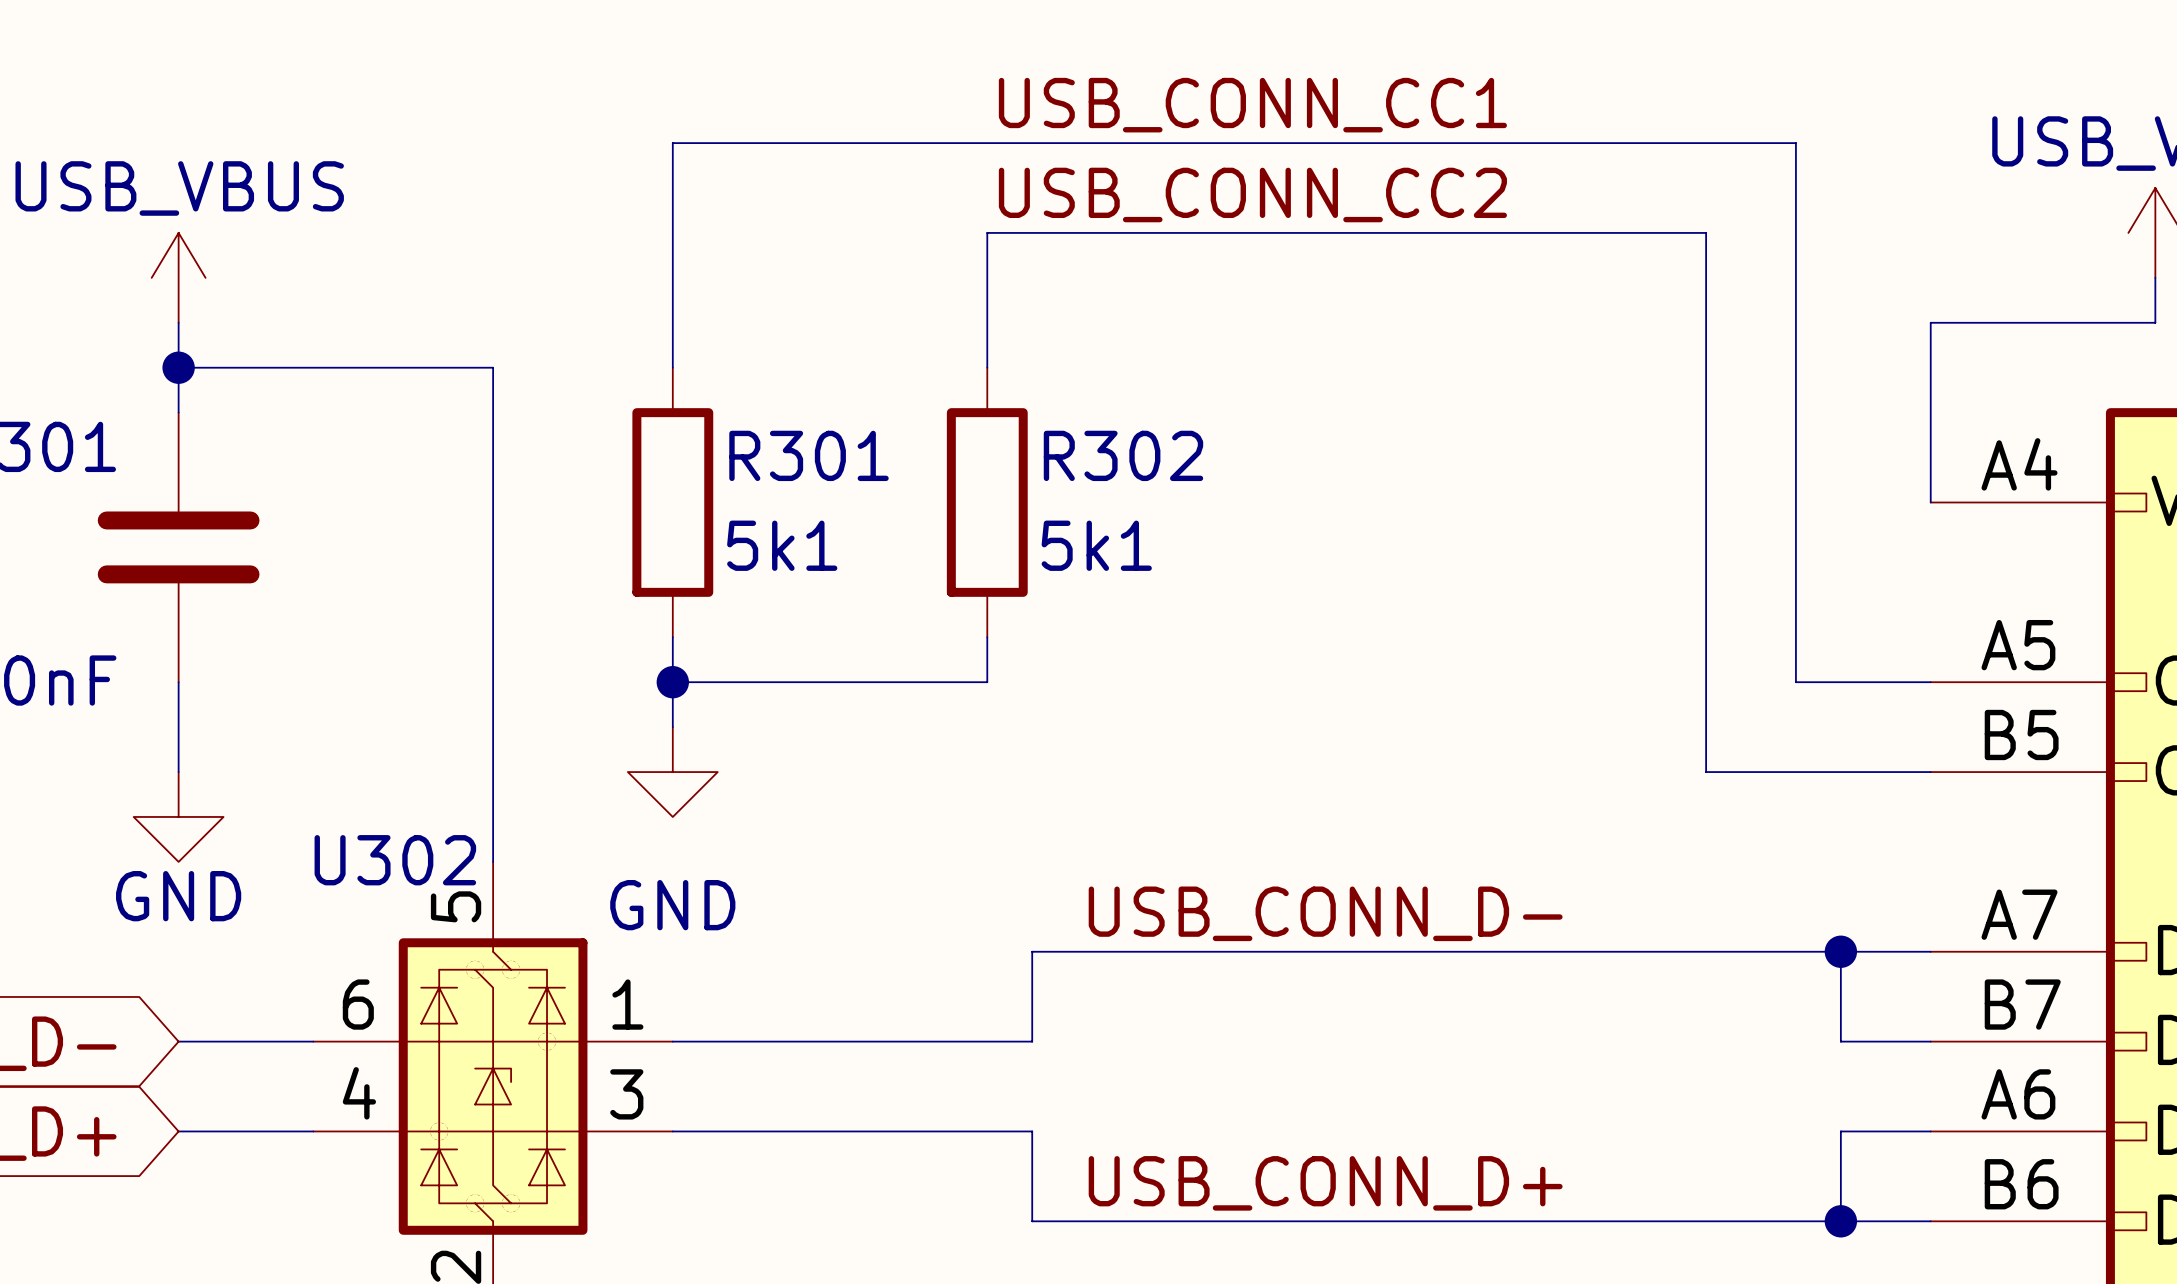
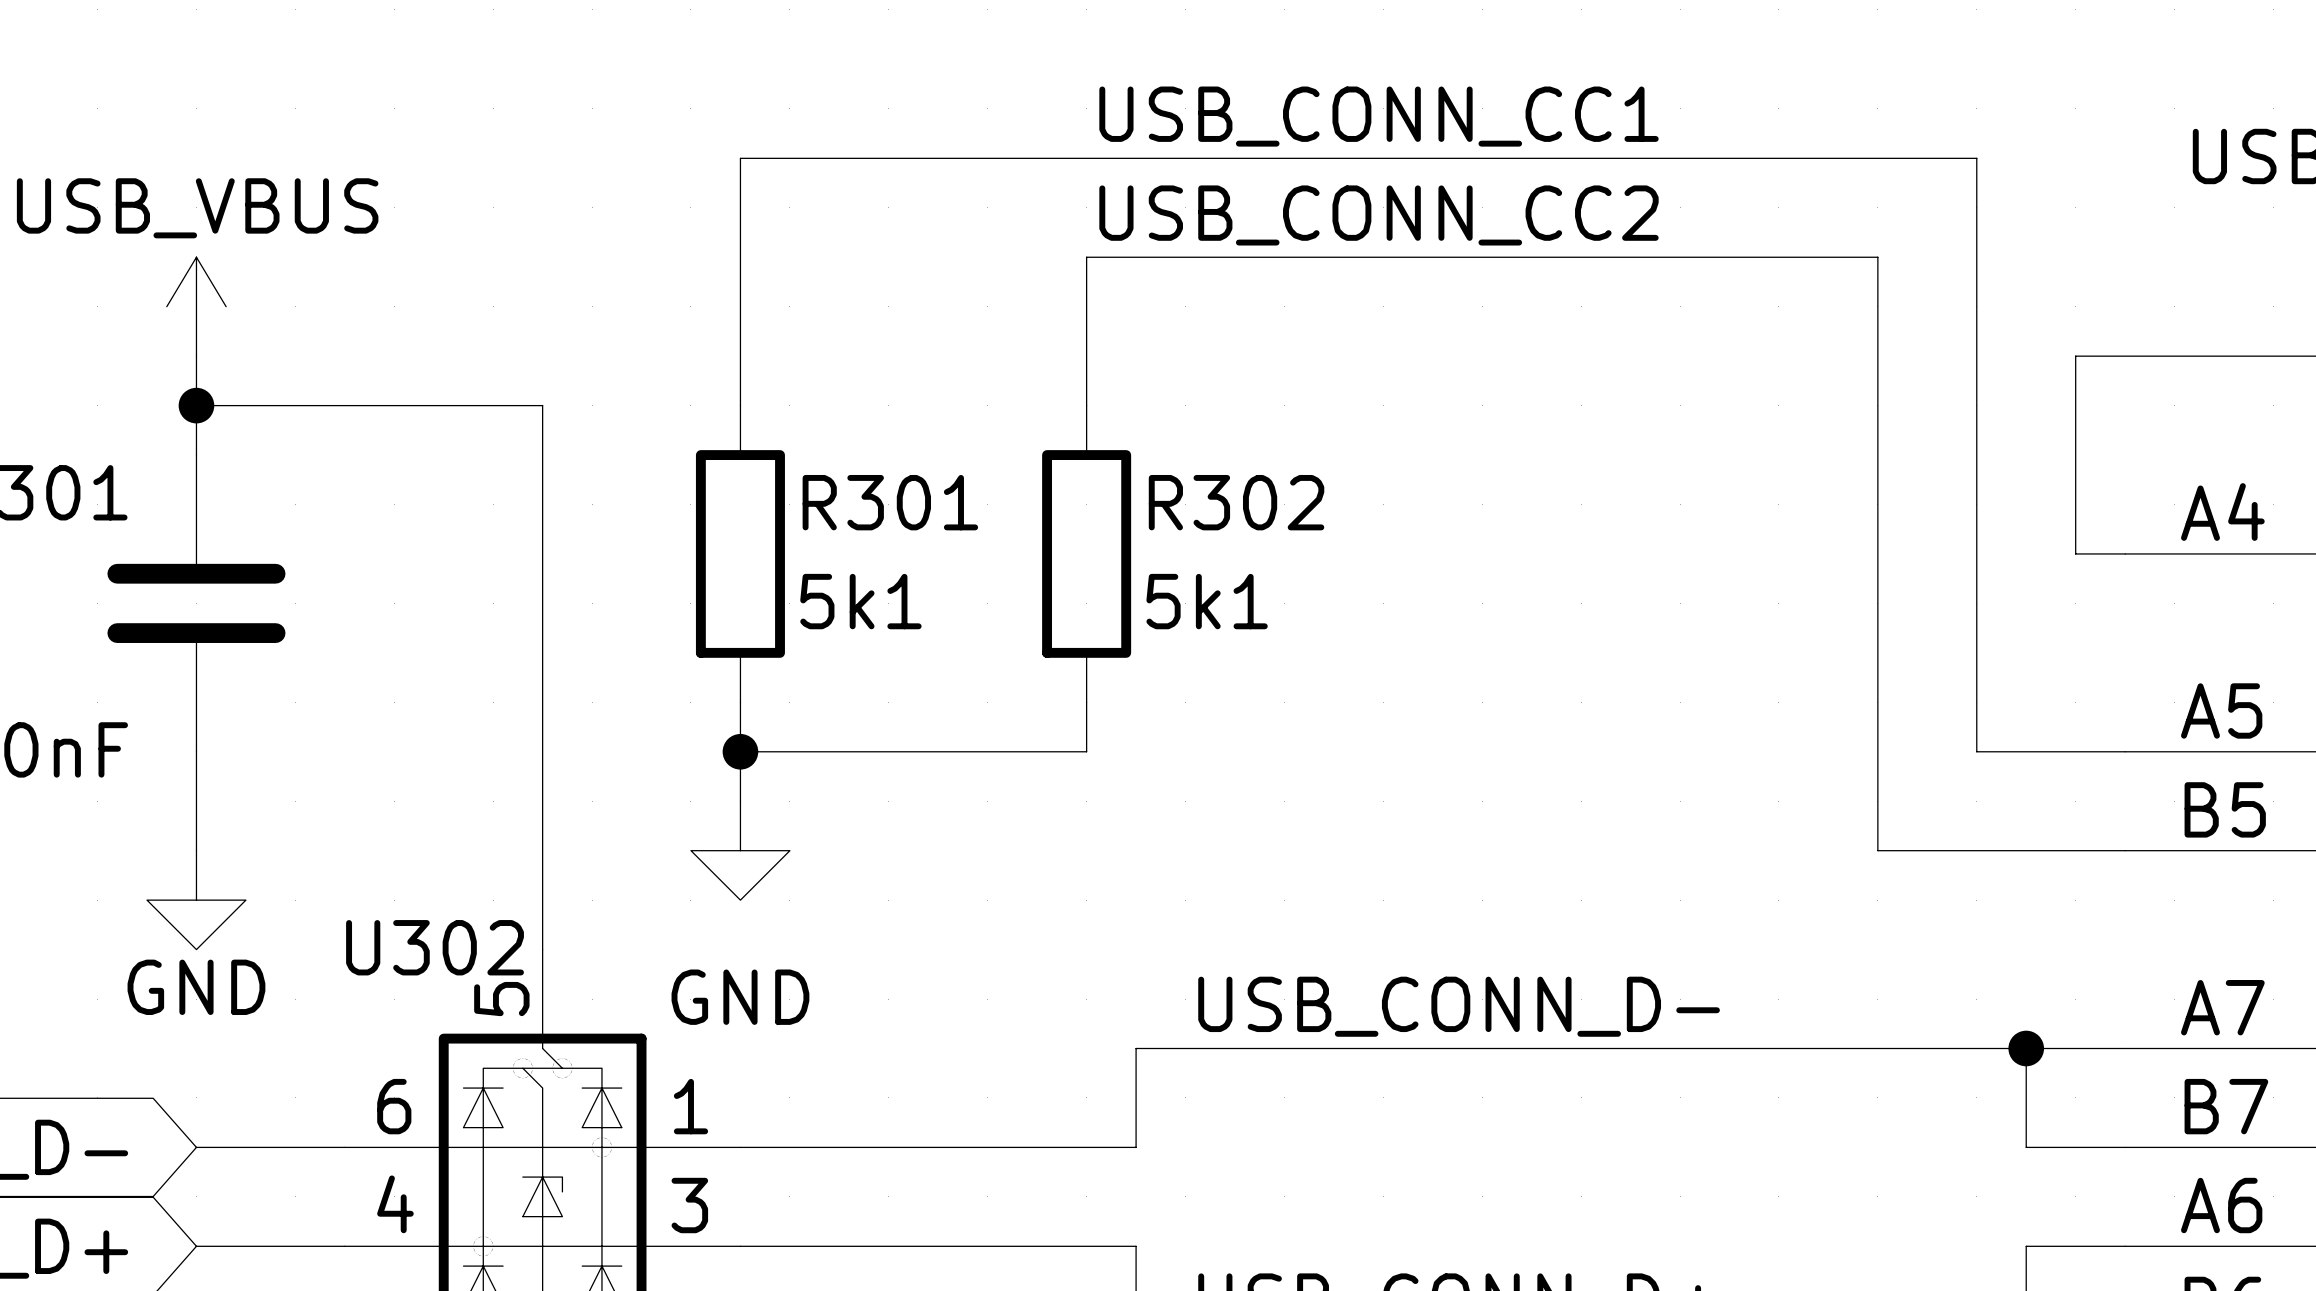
wire: (1930, 322) (1930, 502) -> (2125, 356) (2075, 356) (2075, 553) (2125, 553)

